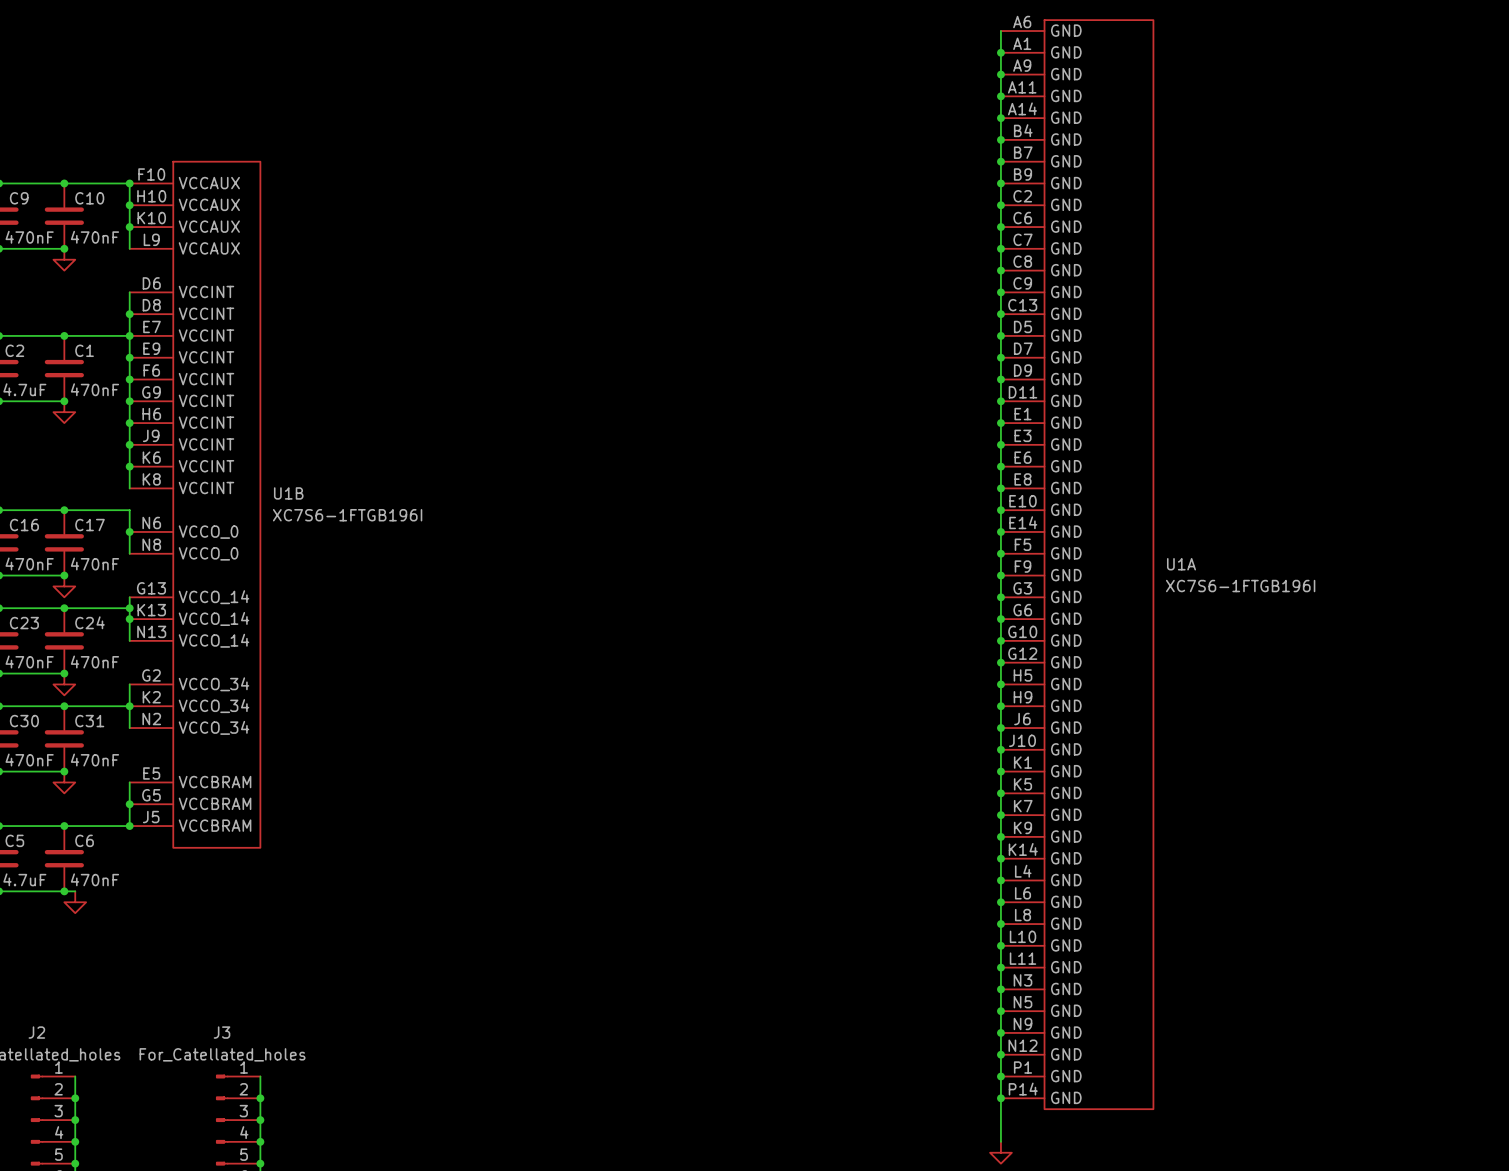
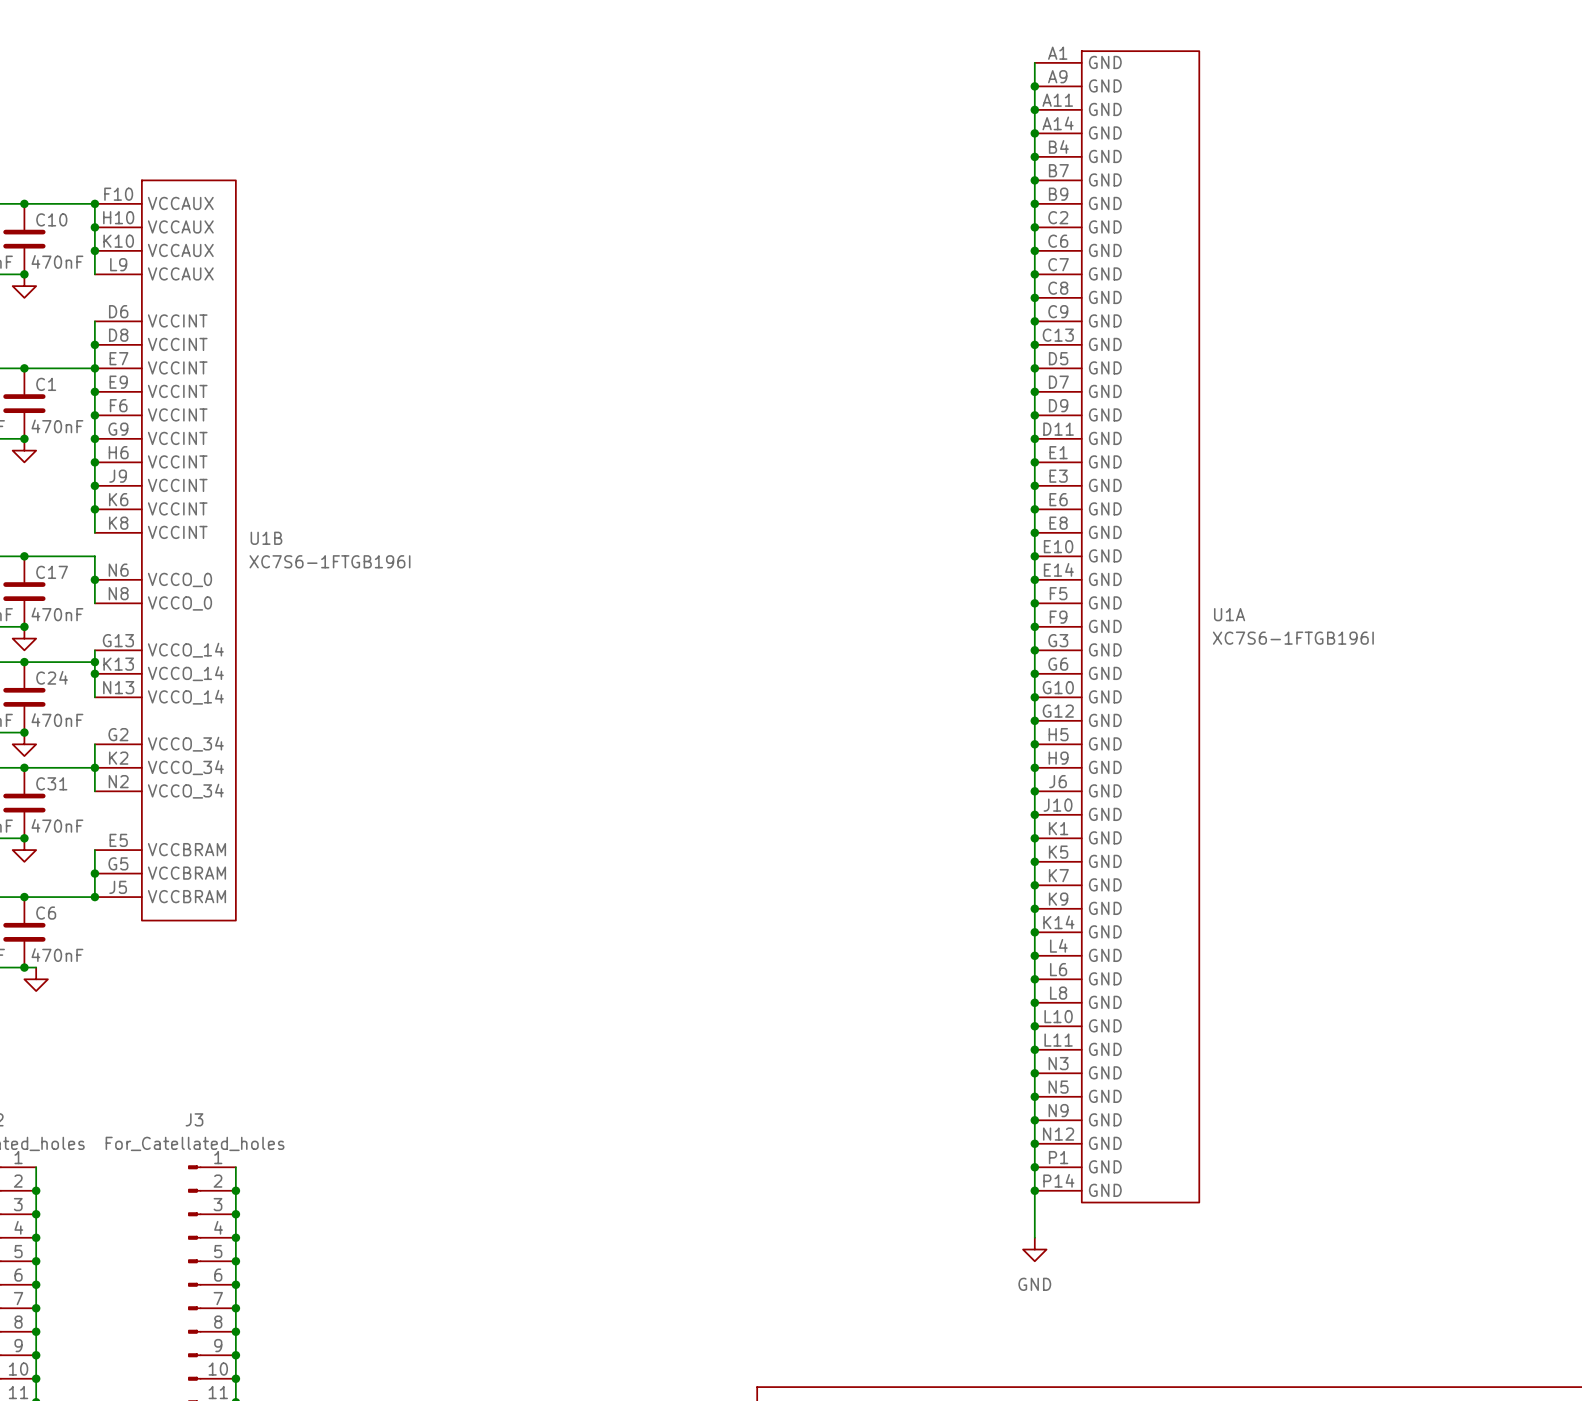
U1A symbol: [1000, 20, 1154, 1110] -> [1034, 51, 1200, 1203]
wire: (1000, 31) (1000, 52) -> none
junction: (1000, 52) -> none

